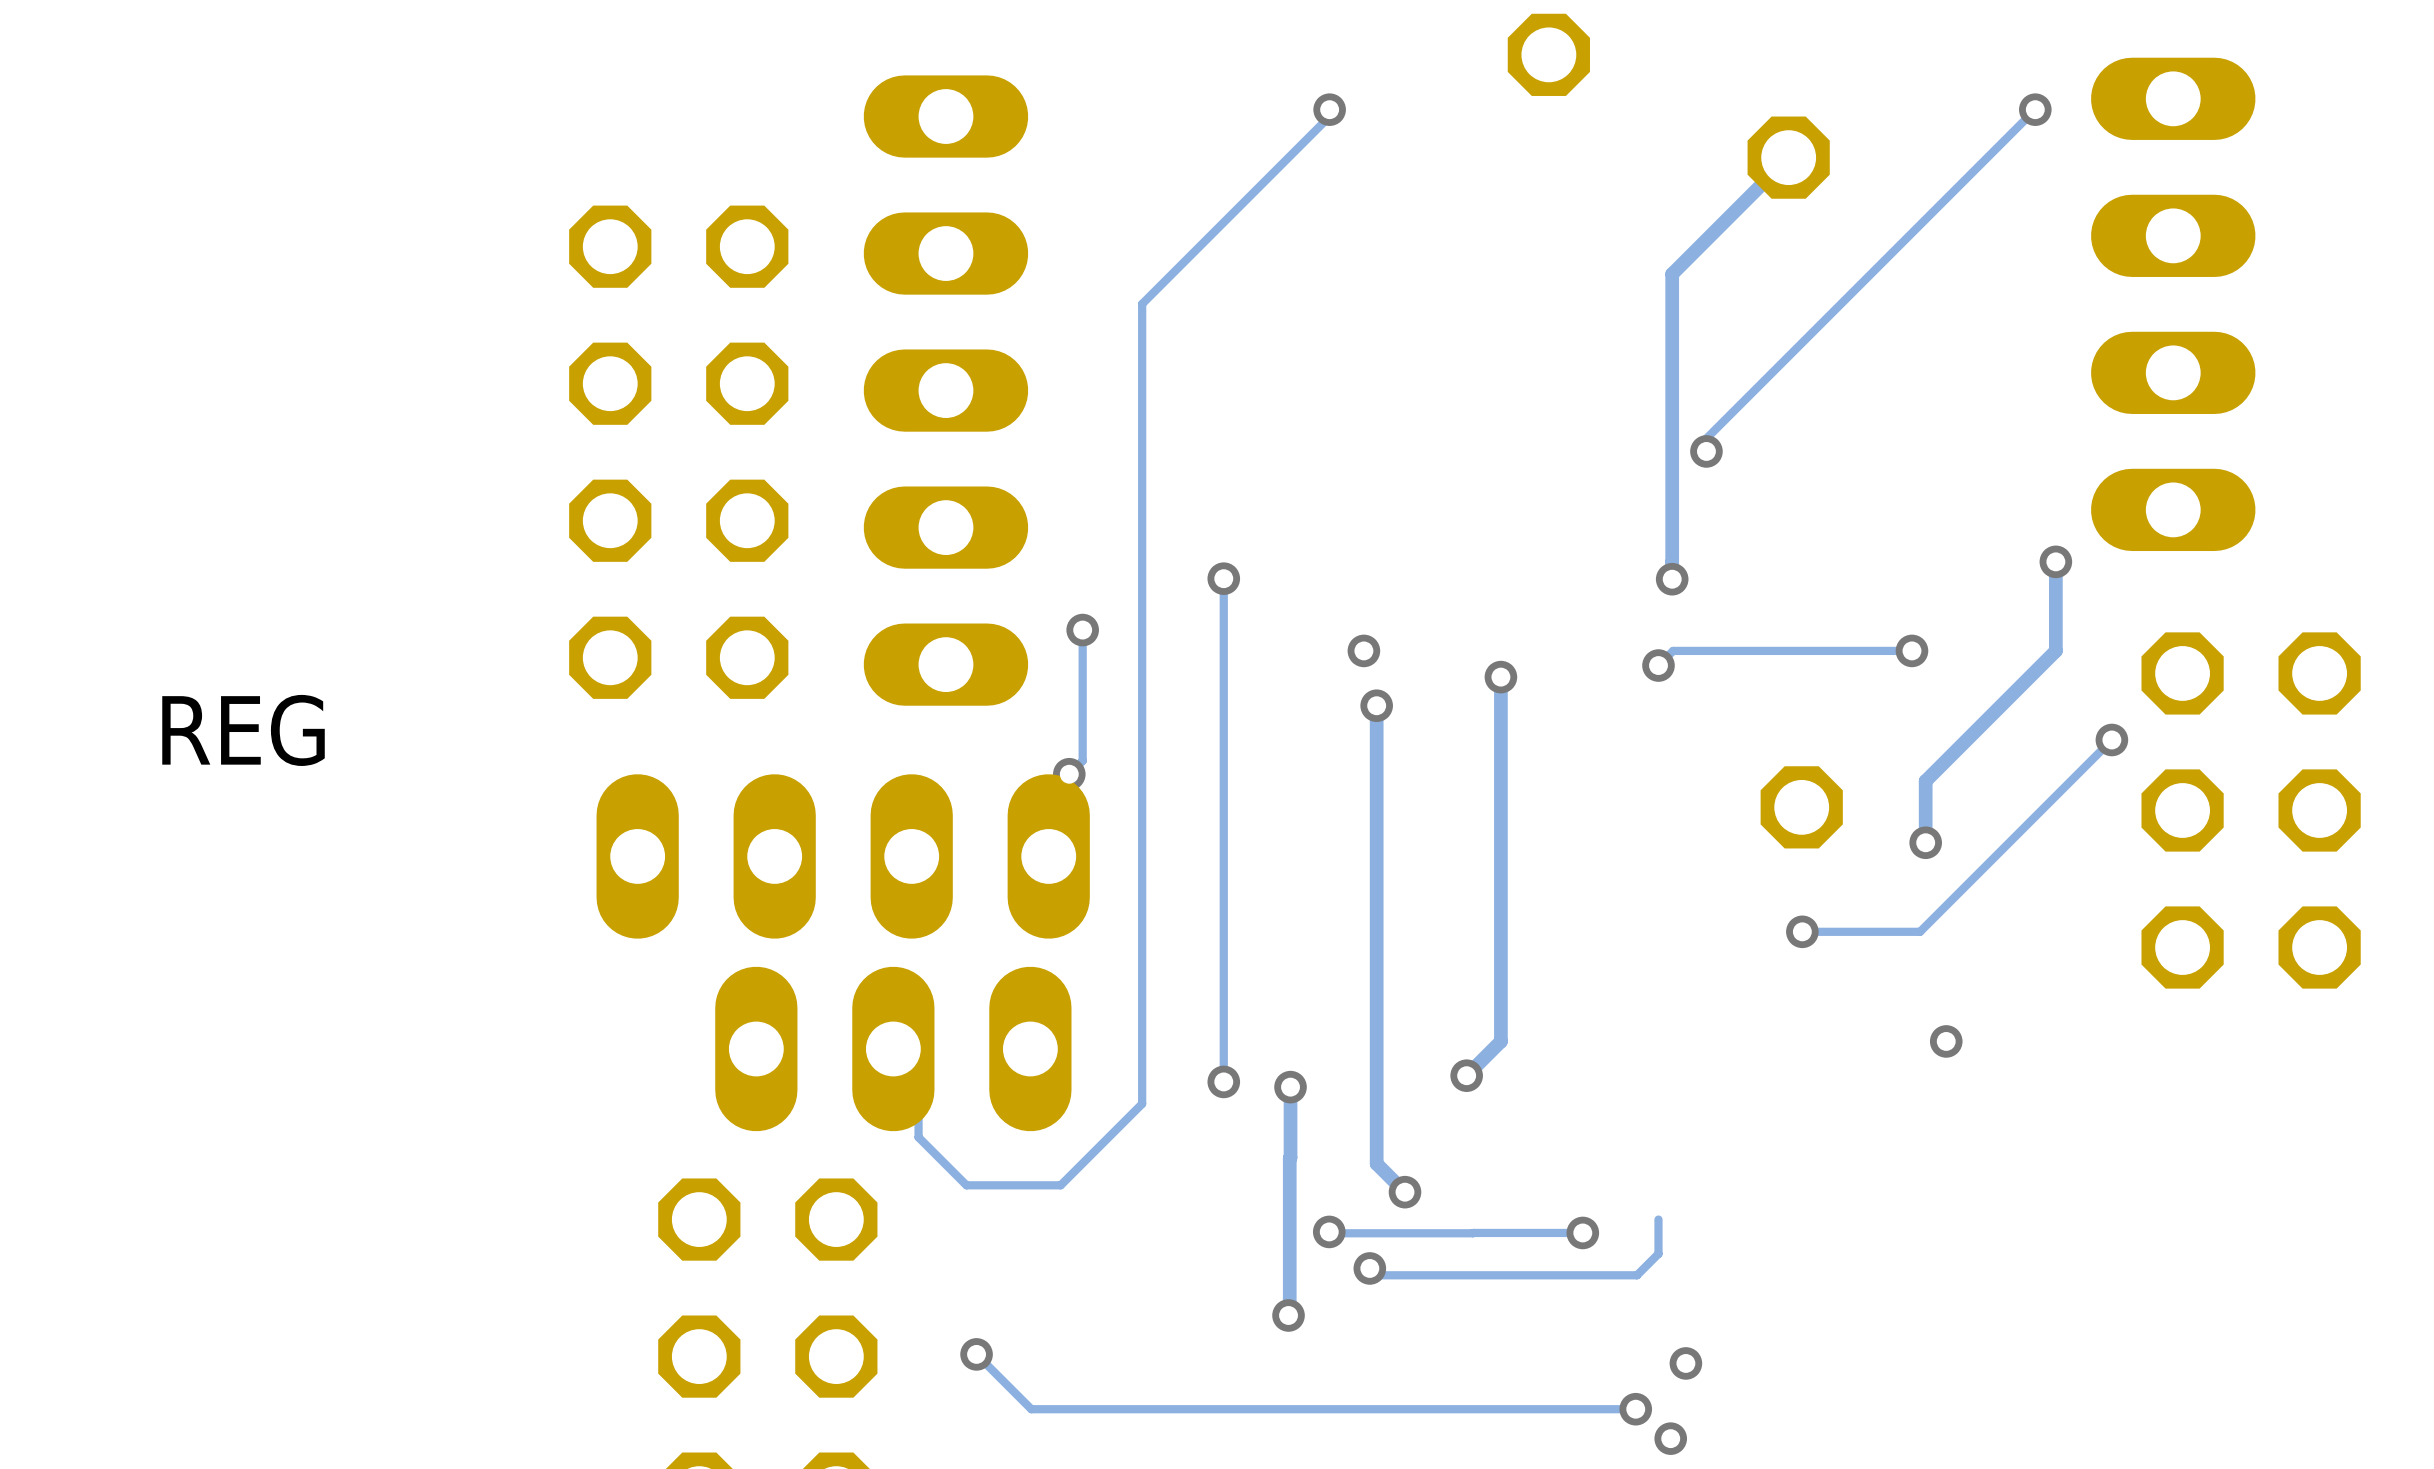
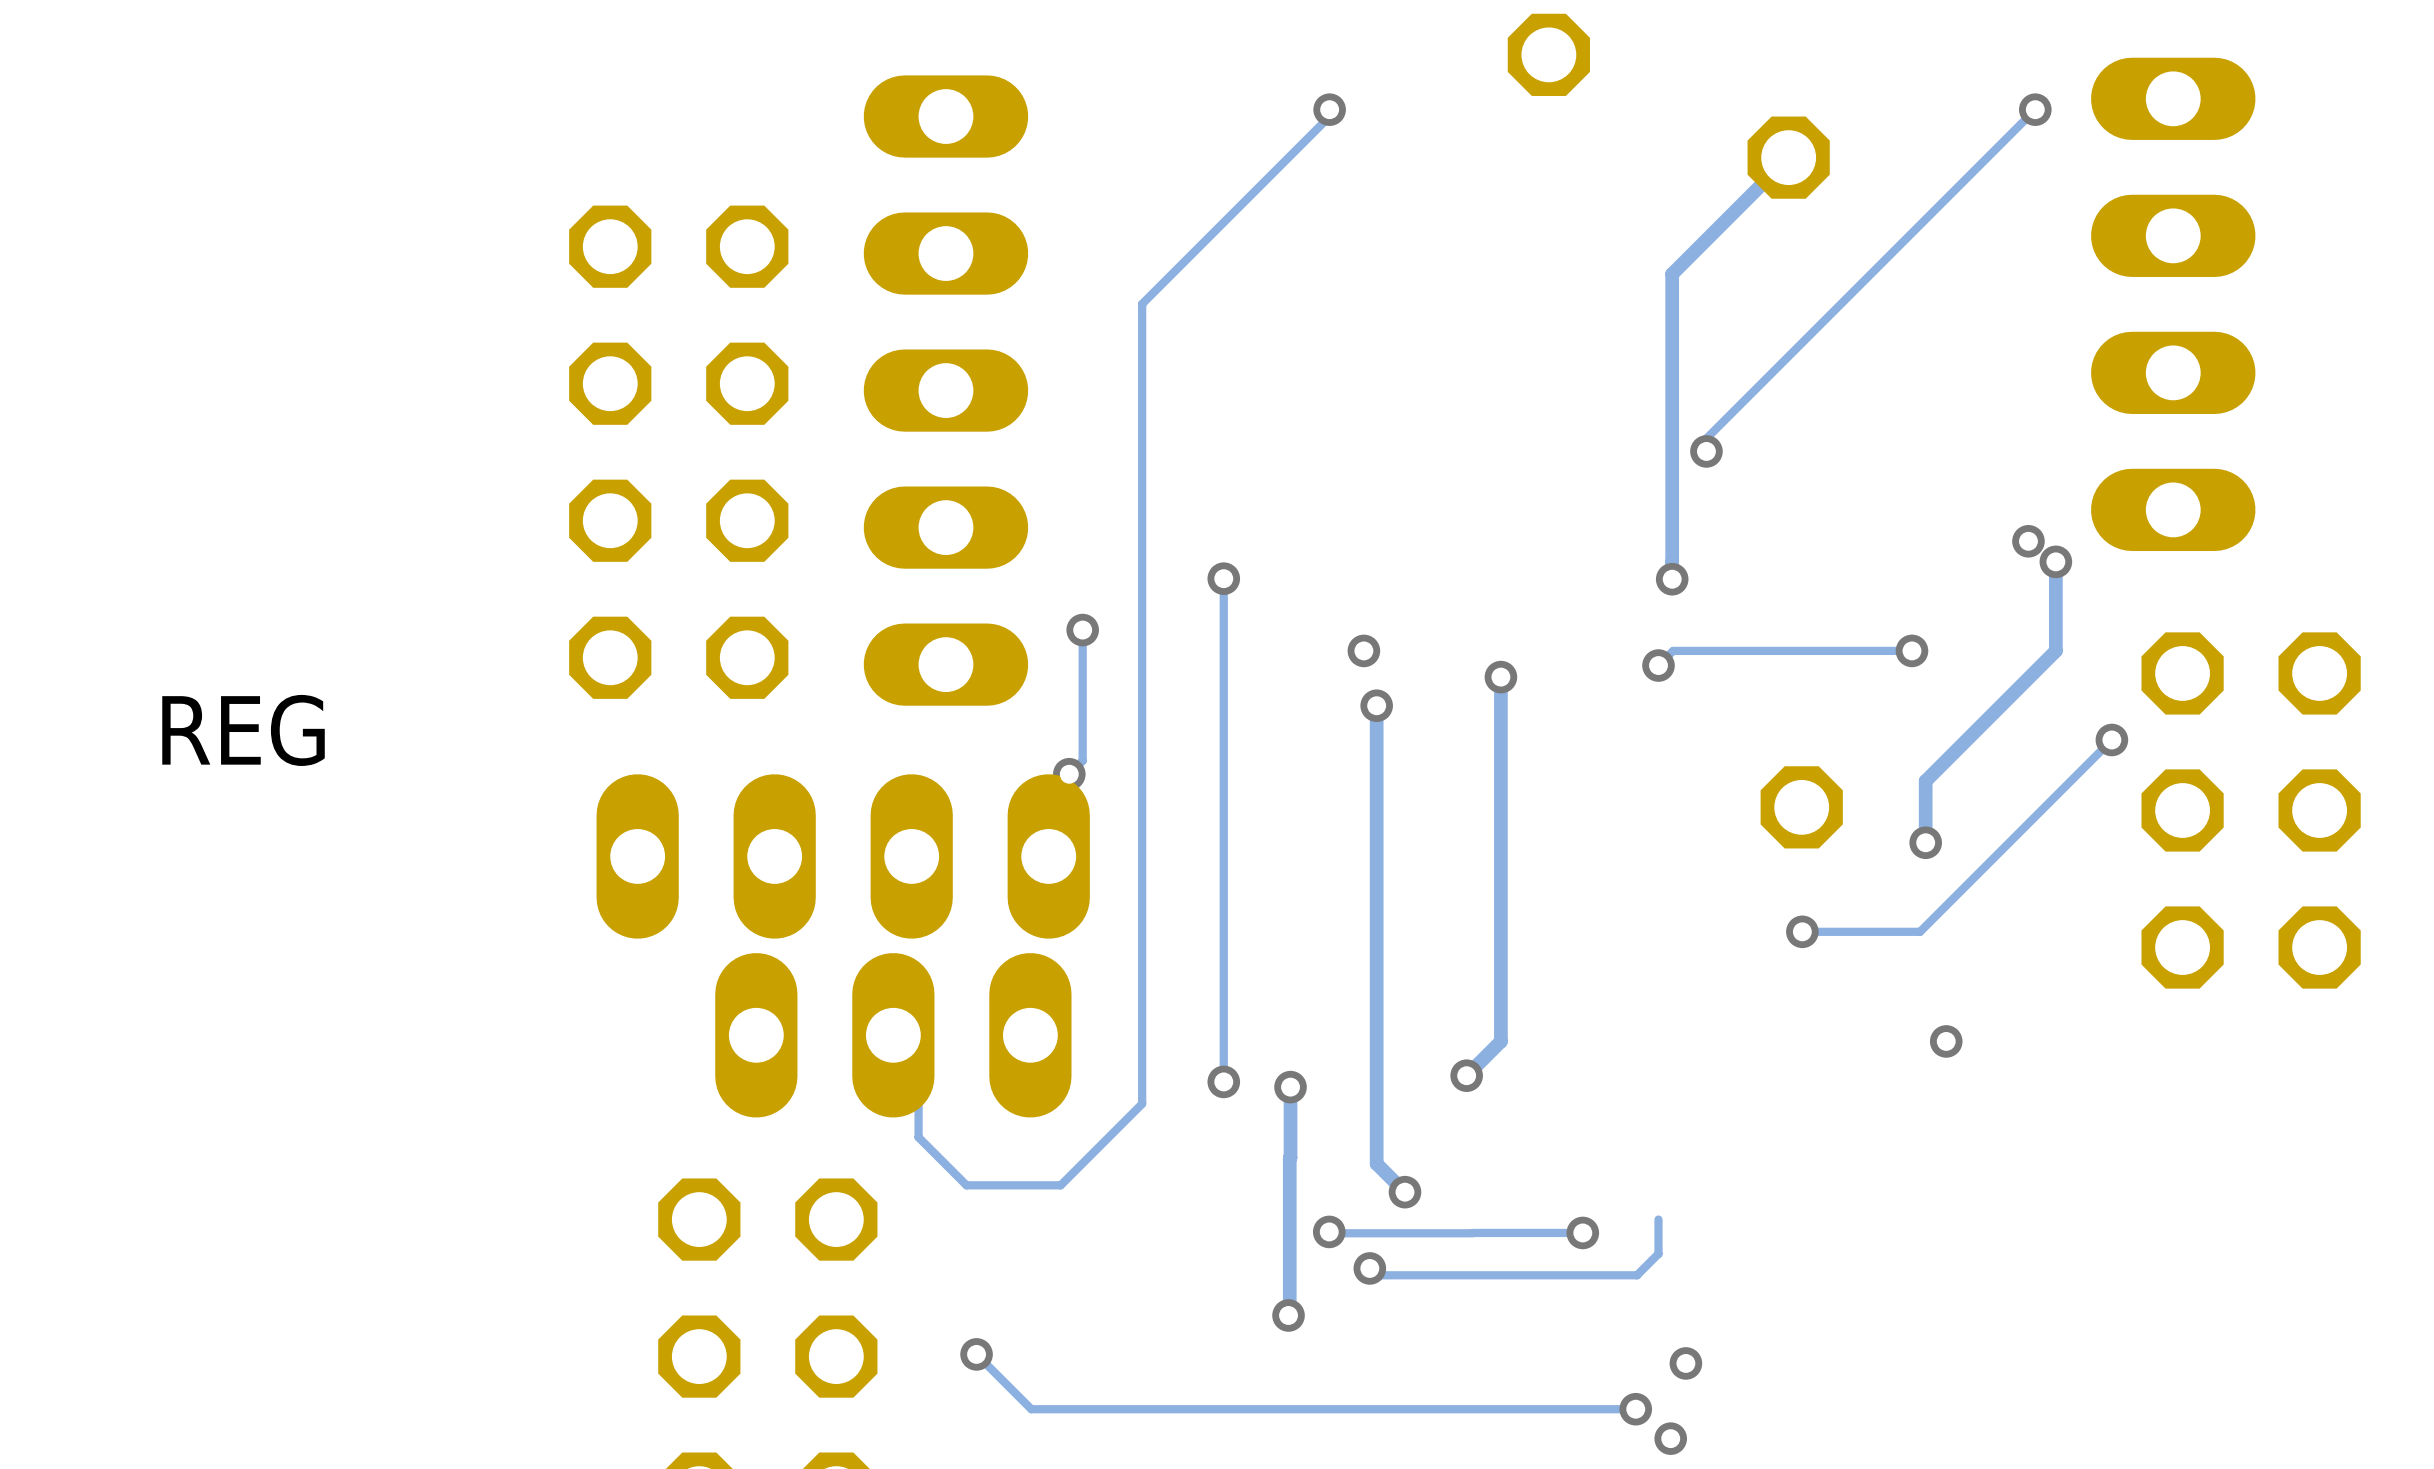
via: none -> (2028, 541)
part position: (893, 1048) -> (893, 1035)

